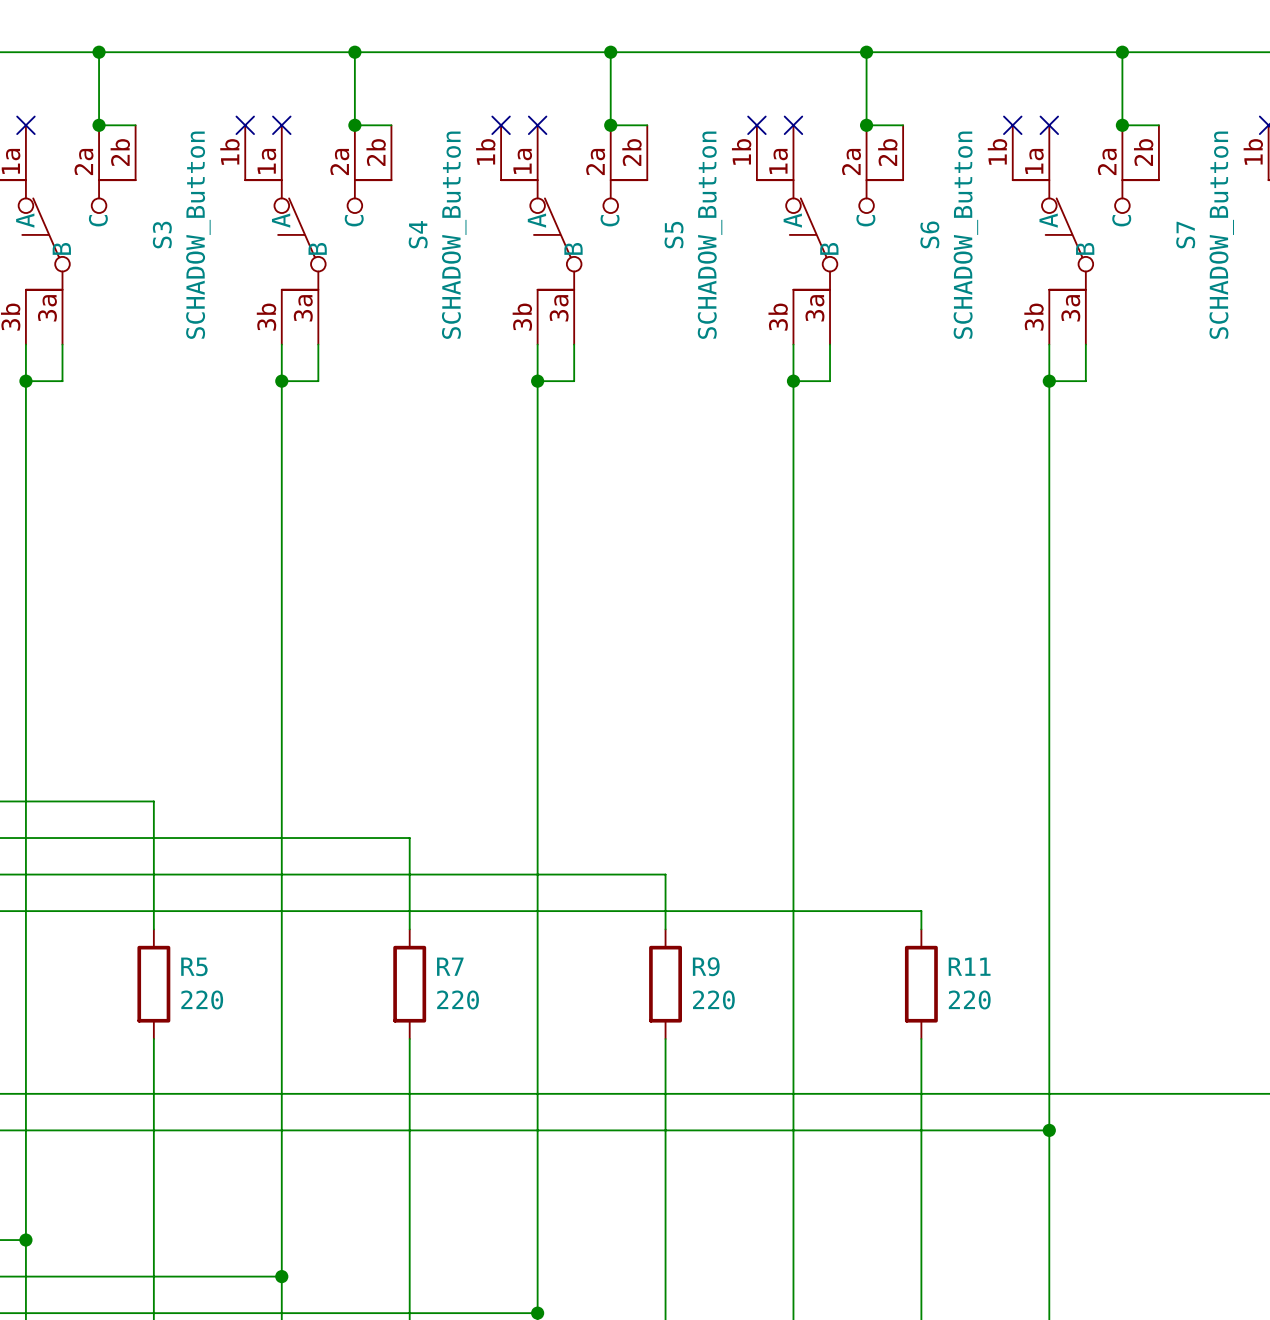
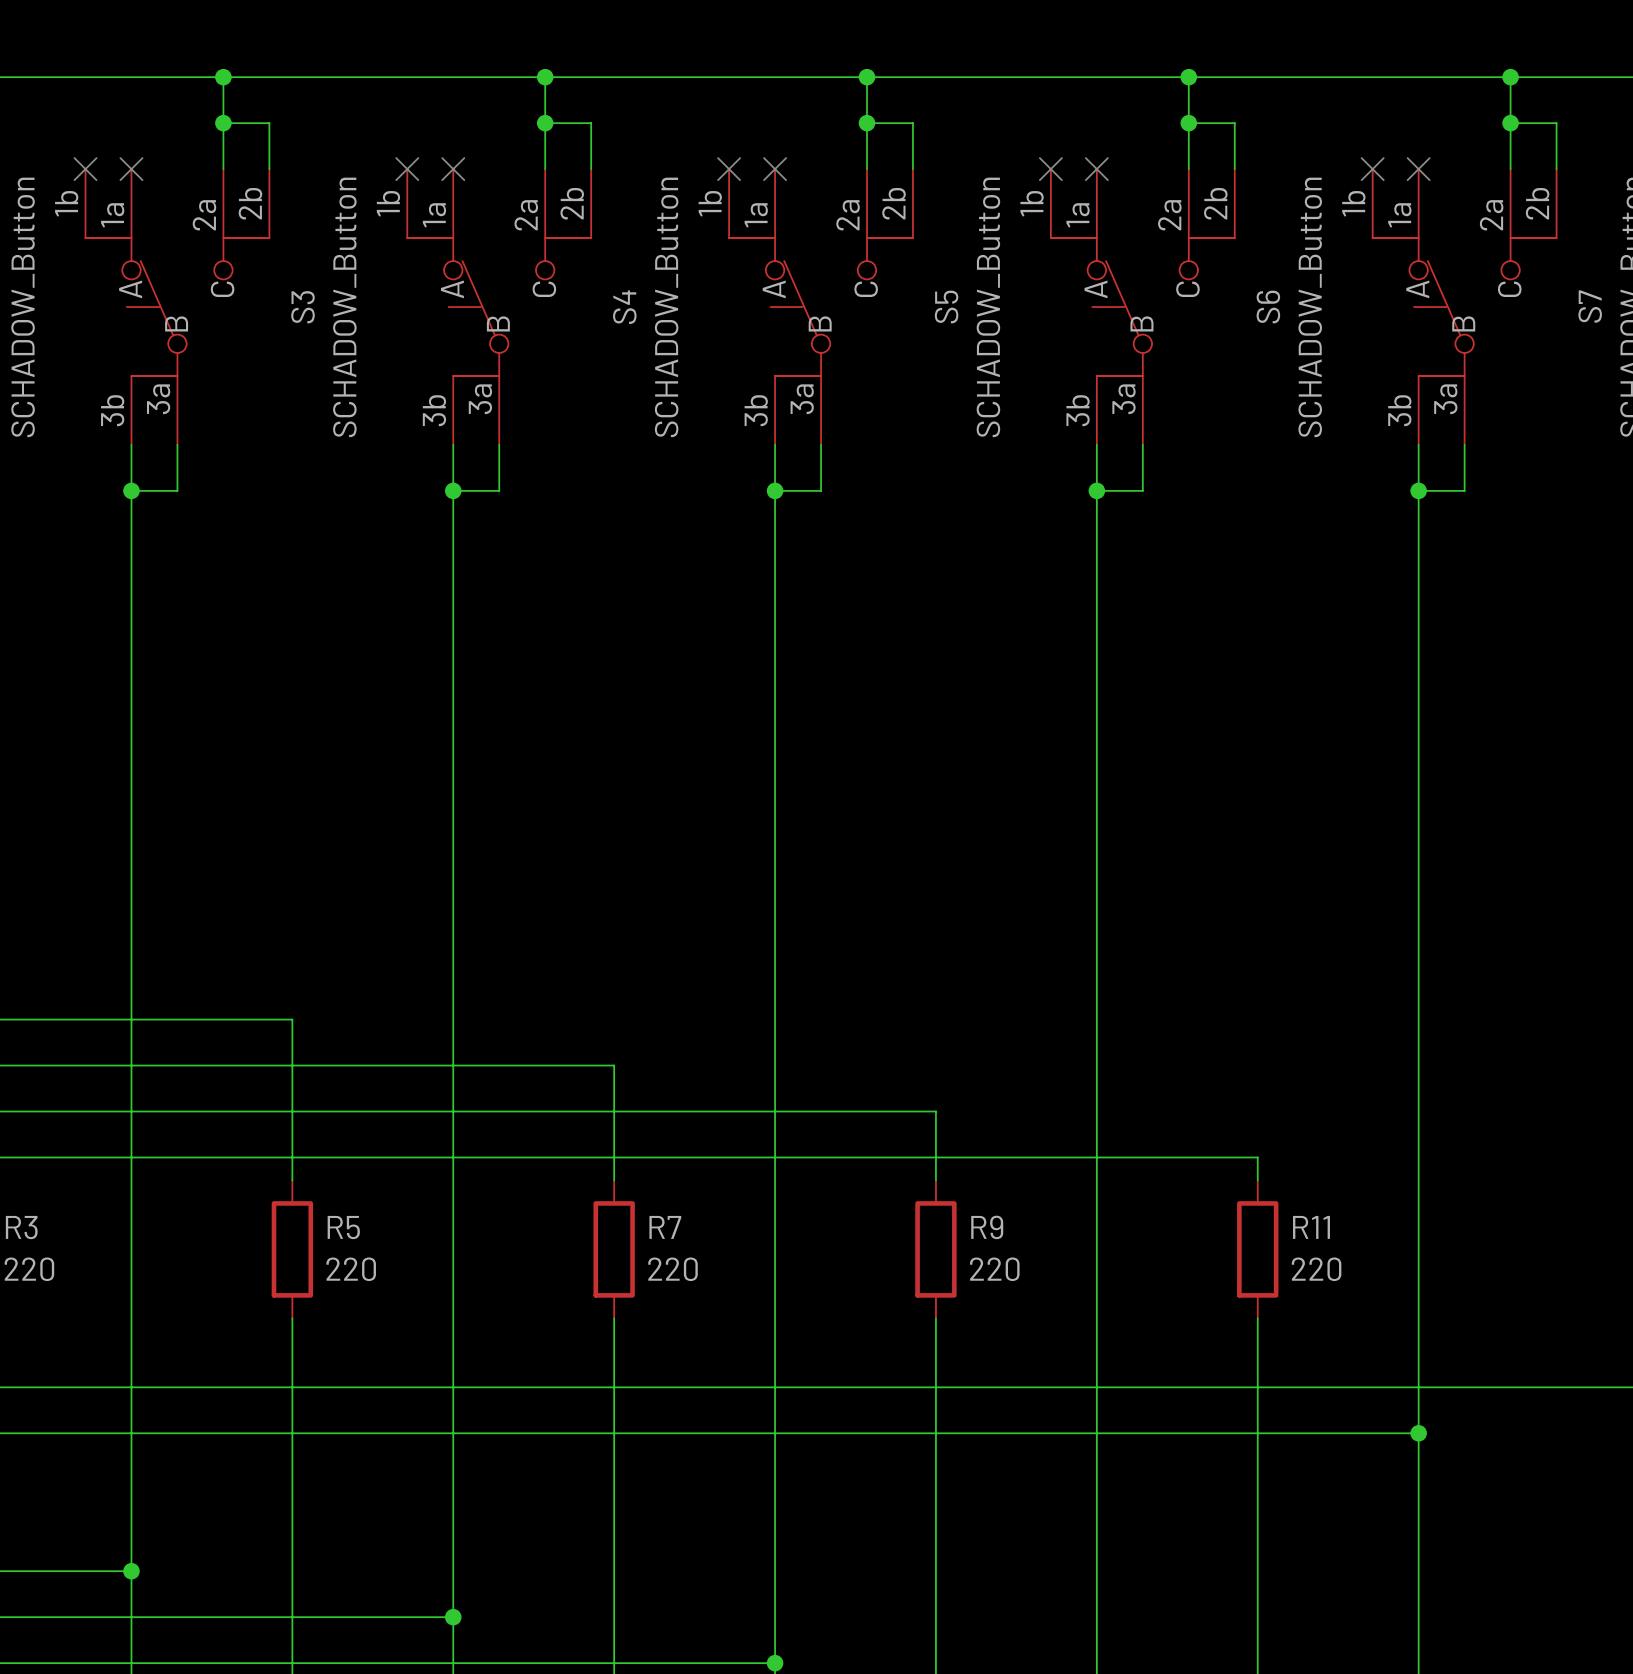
wire: (99, 125) (135, 125) -> (223, 123) (269, 123) (269, 169)
junction position: (99, 125) -> (223, 123)
wire: (354, 125) (391, 125) -> (545, 123) (591, 123) (591, 169)
junction position: (354, 125) -> (545, 123)
wire: (610, 125) (647, 125) -> (867, 123) (912, 123) (912, 169)
junction position: (610, 125) -> (867, 123)
wire: (866, 125) (903, 125) -> (1188, 123) (1234, 123) (1234, 169)
junction position: (866, 125) -> (1188, 123)
wire: (1122, 125) (1158, 125) -> (1510, 123) (1556, 123) (1556, 169)
junction position: (1122, 125) -> (1510, 123)

